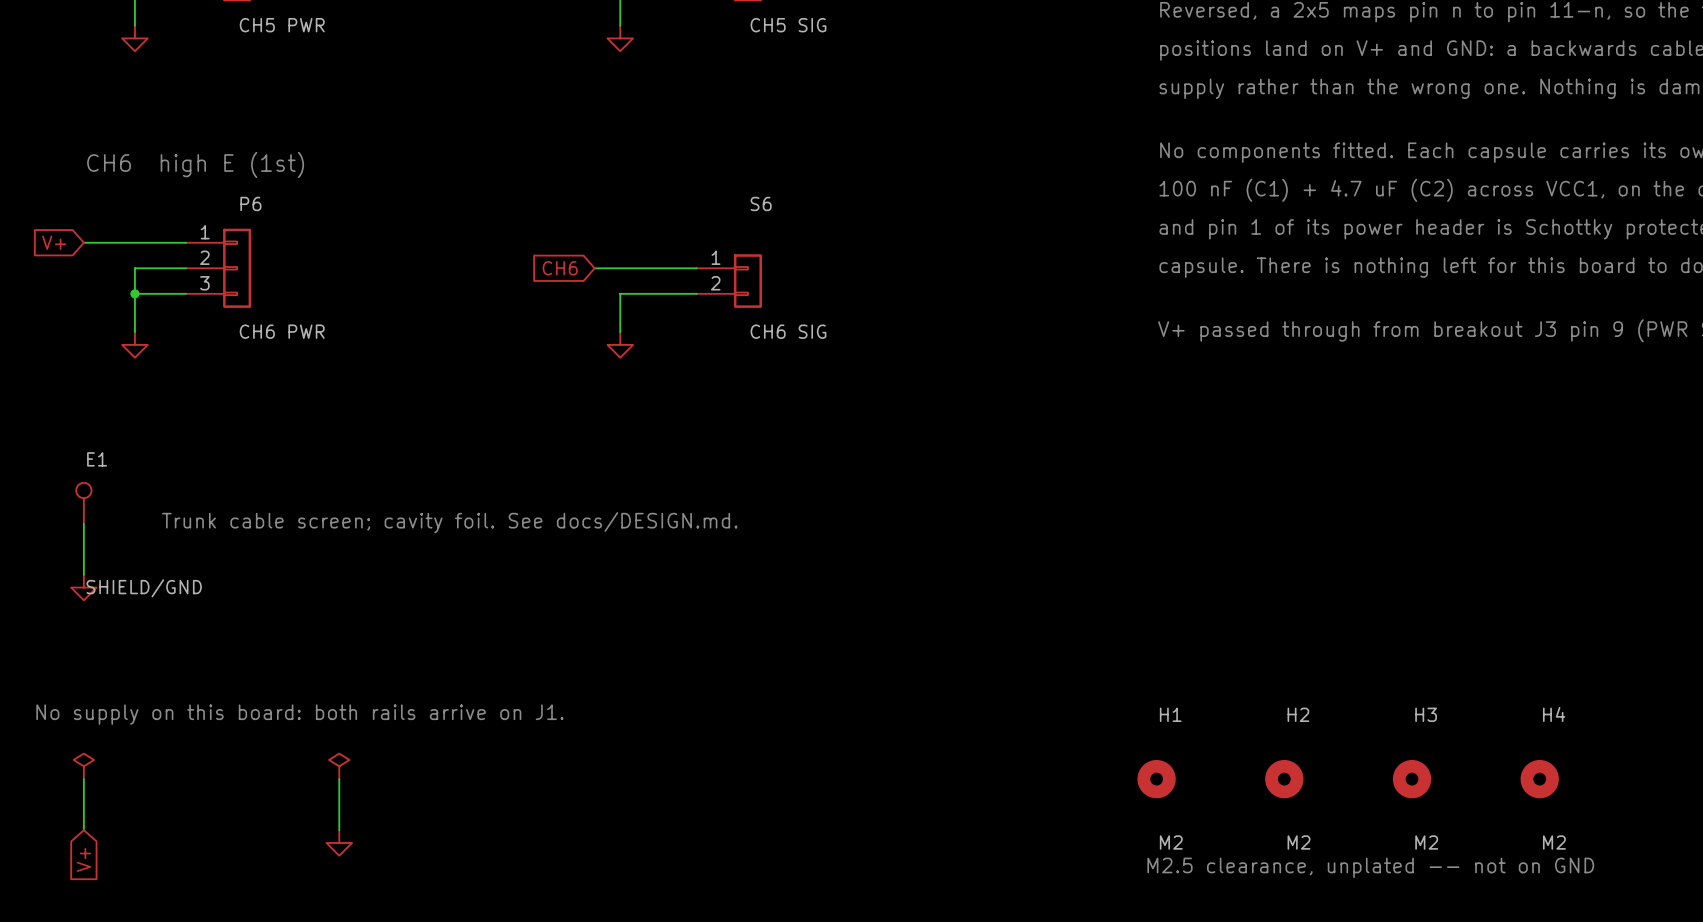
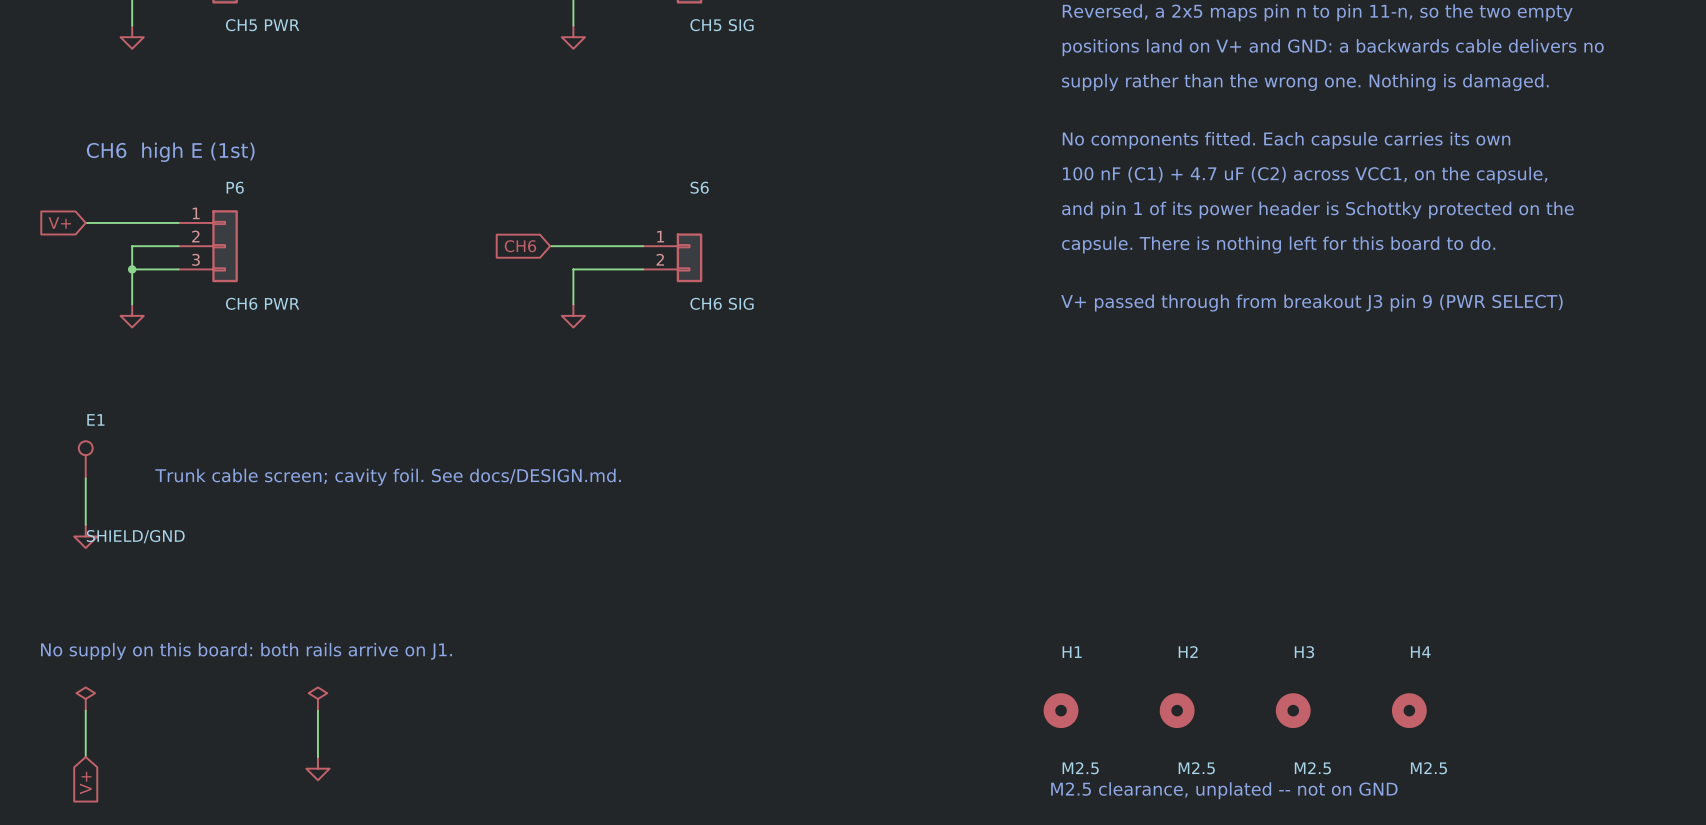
H1 value: M2 (1171, 842) -> M2.5 (1080, 768)
H2 value: M2 (1299, 842) -> M2.5 (1196, 768)
H3 value: M2 (1426, 842) -> M2.5 (1312, 768)
H4 value: M2 (1554, 842) -> M2.5 (1428, 768)

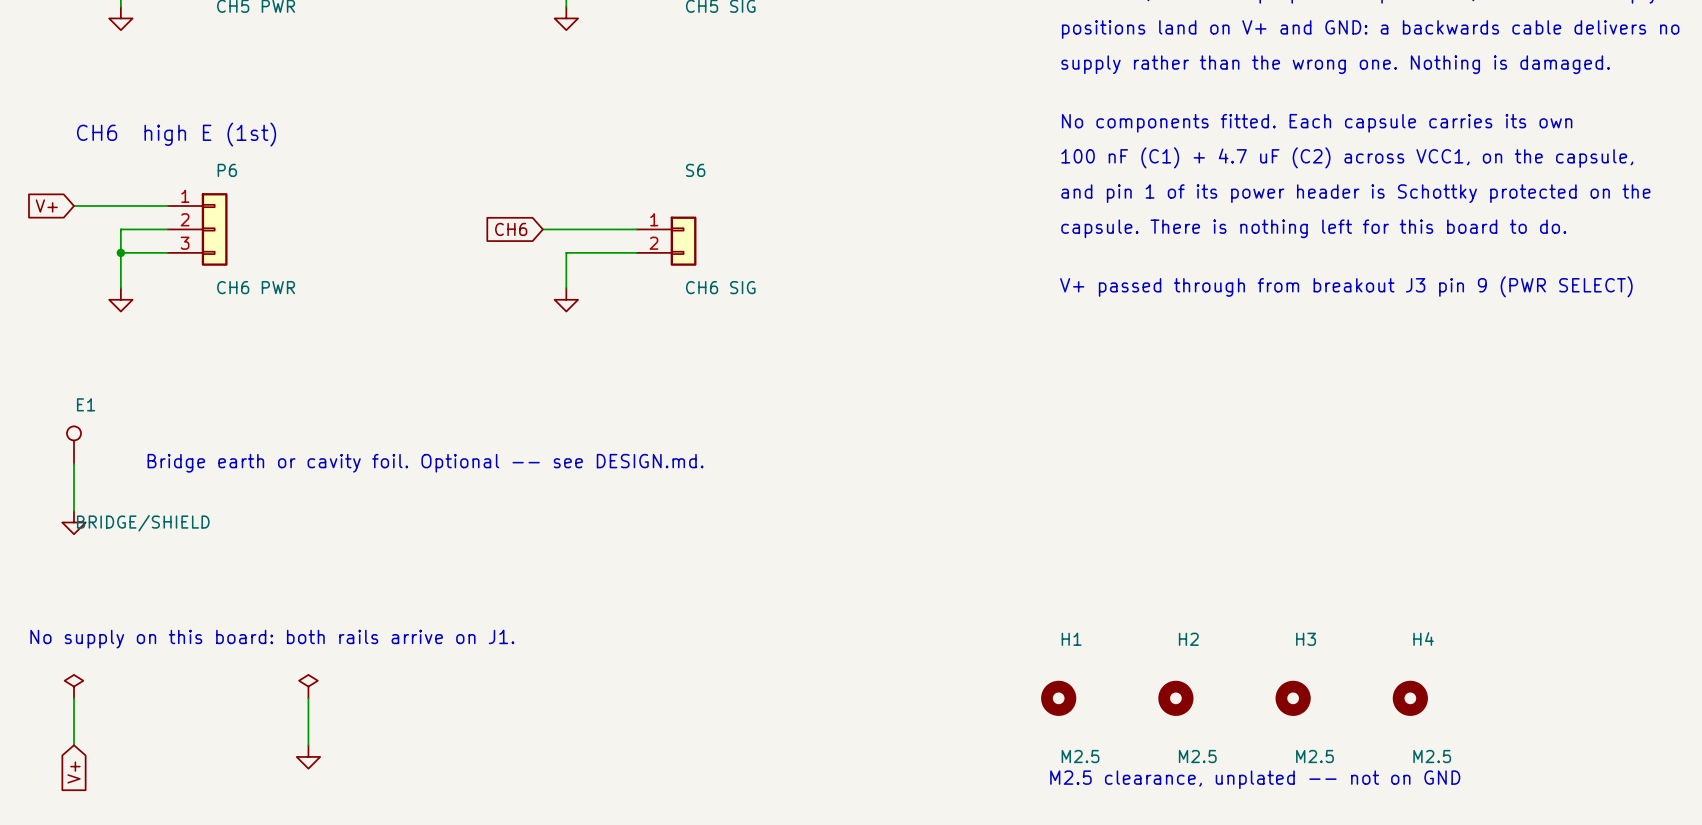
text: Trunk cable screen; cavity foil. See docs/DESIGN.md. (388, 477) -> Bridge earth or cavity foil. Optional -- see DESIGN.md. (425, 463)
E1 value: SHIELD/GND (135, 536) -> BRIDGE/SHIELD (143, 523)

